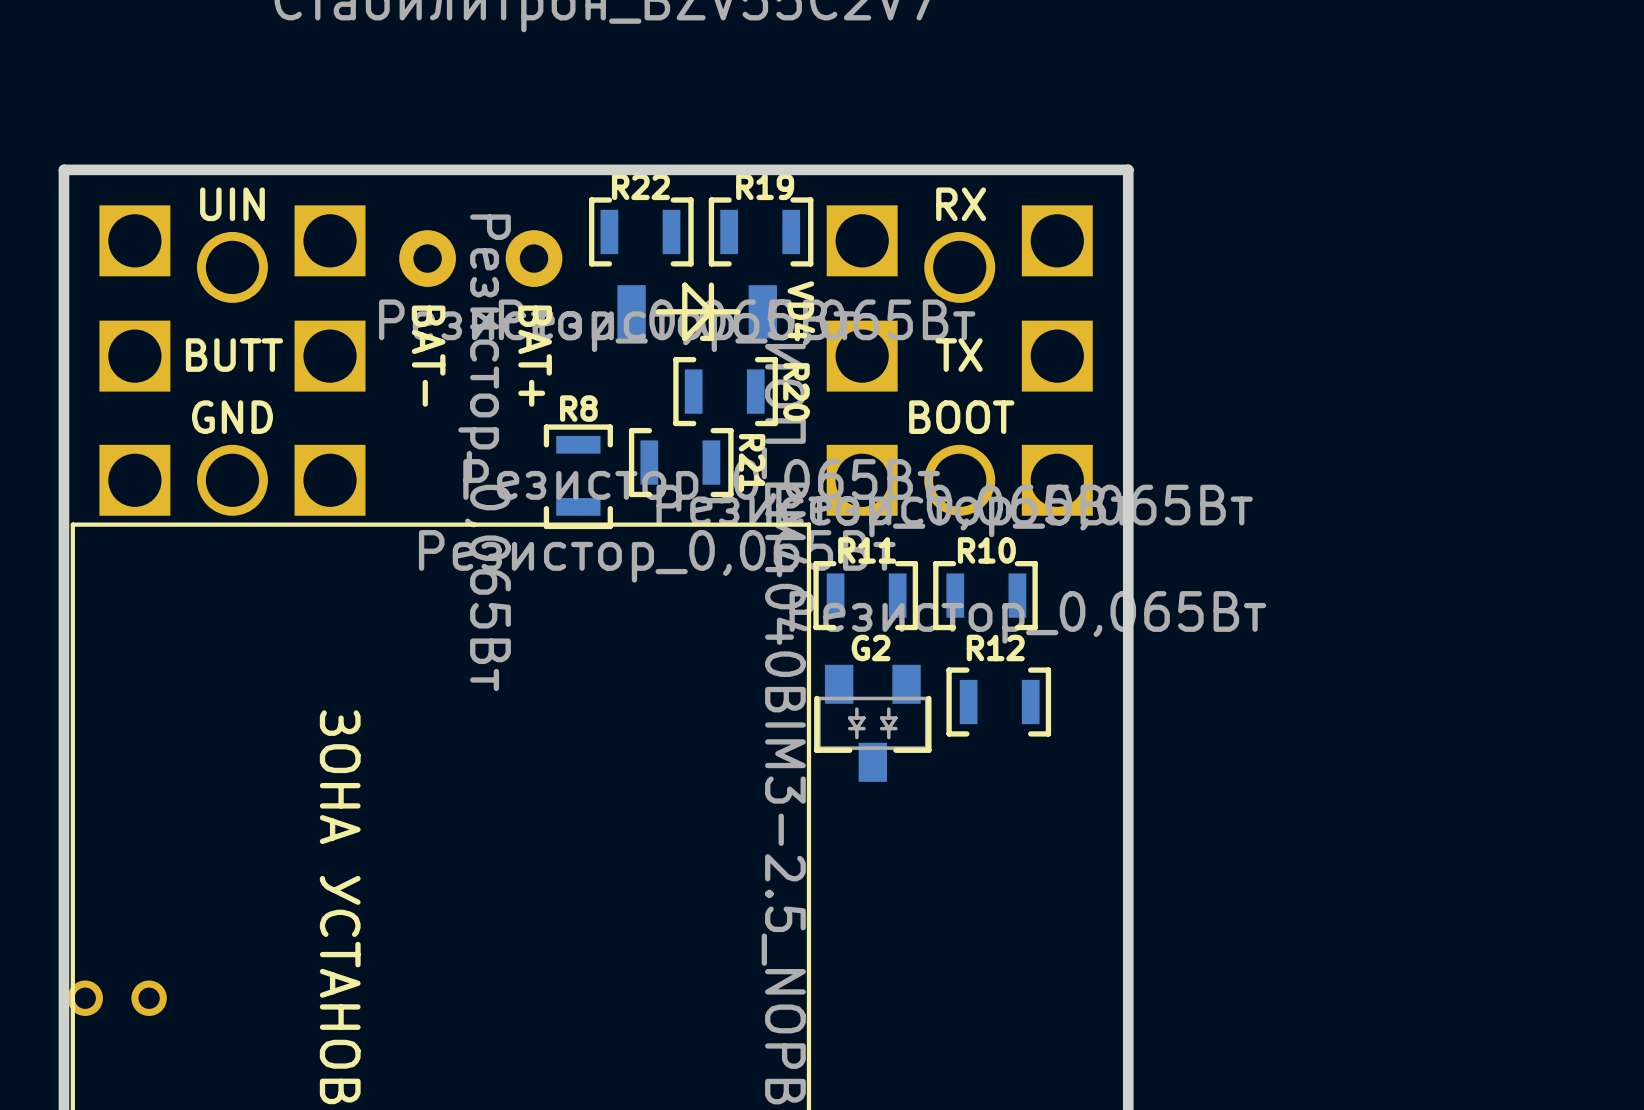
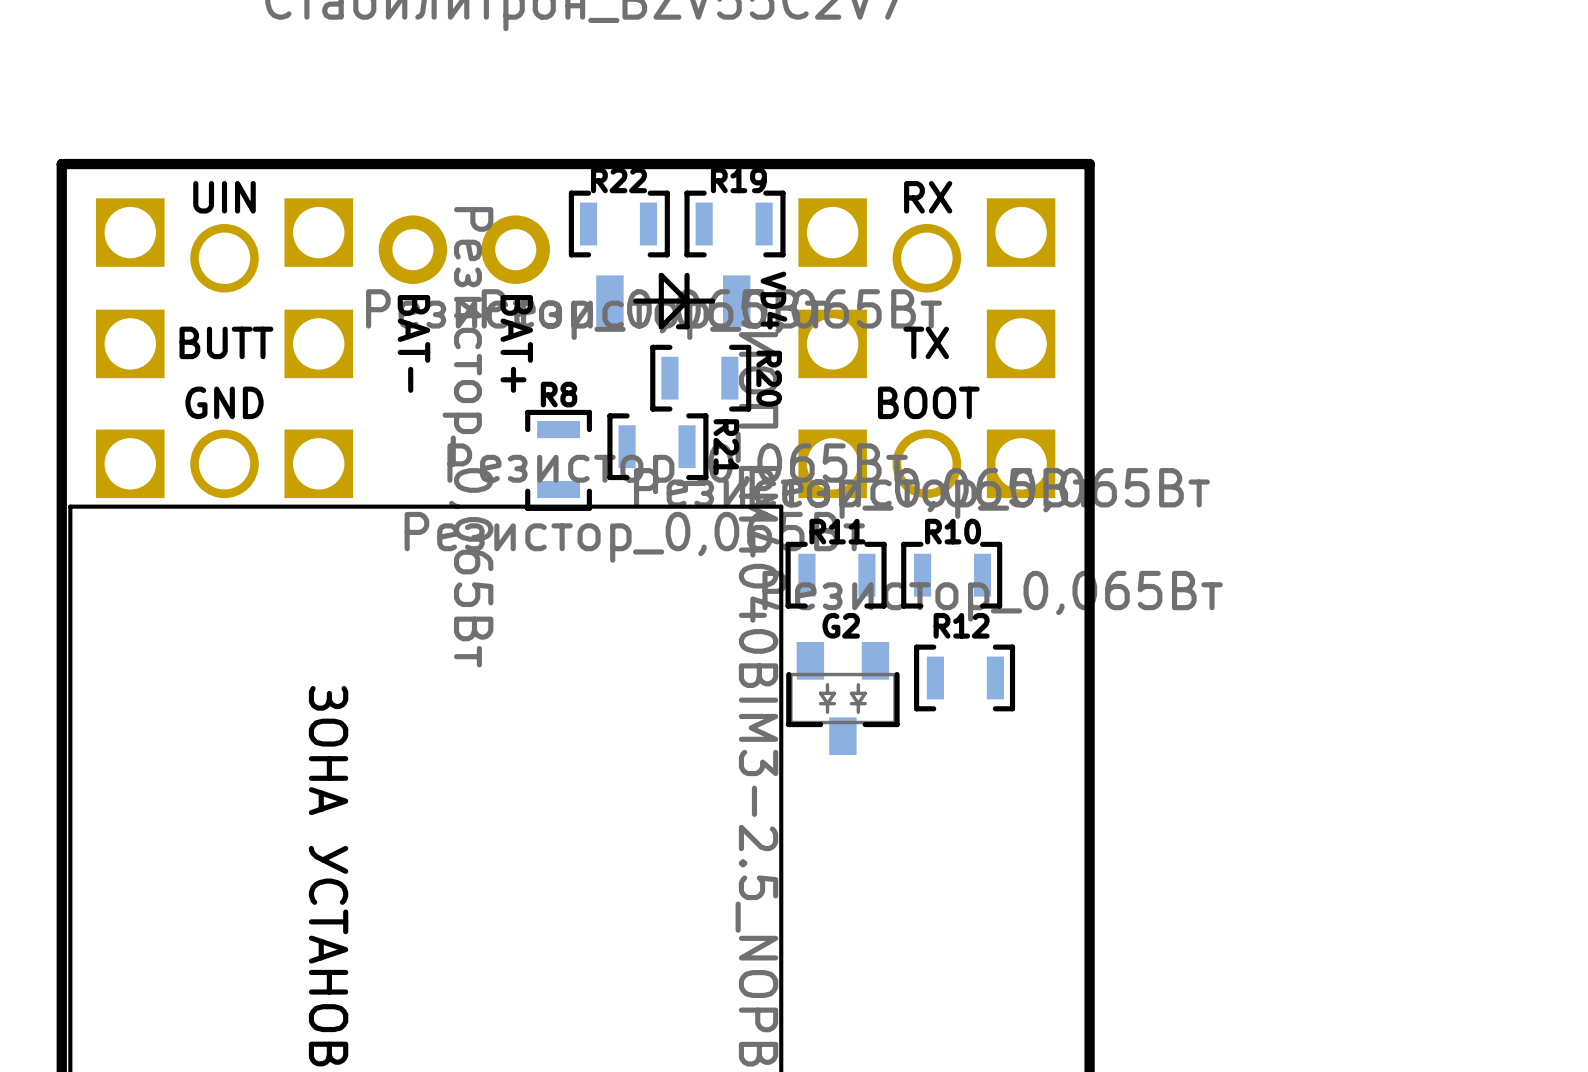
part footprint: [399, 230, 456, 287] -> [378, 215, 448, 284]
part footprint: [505, 230, 563, 287] -> [481, 215, 550, 284]
part: (117, 998) -> none

